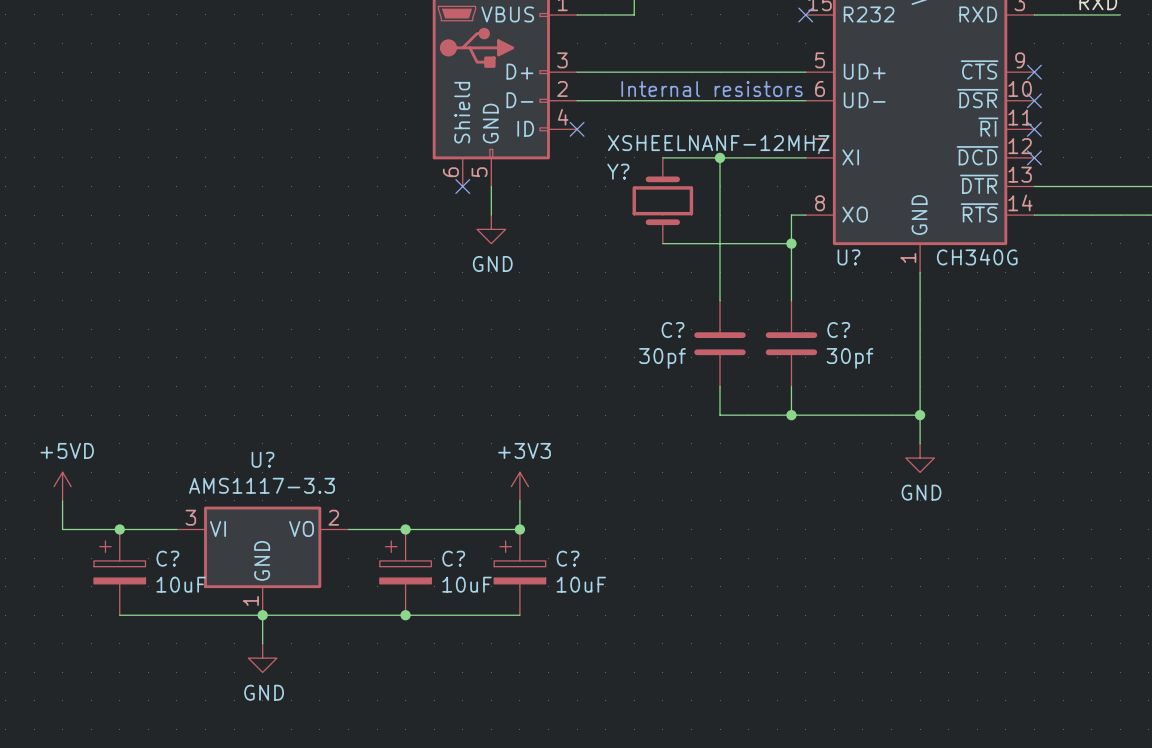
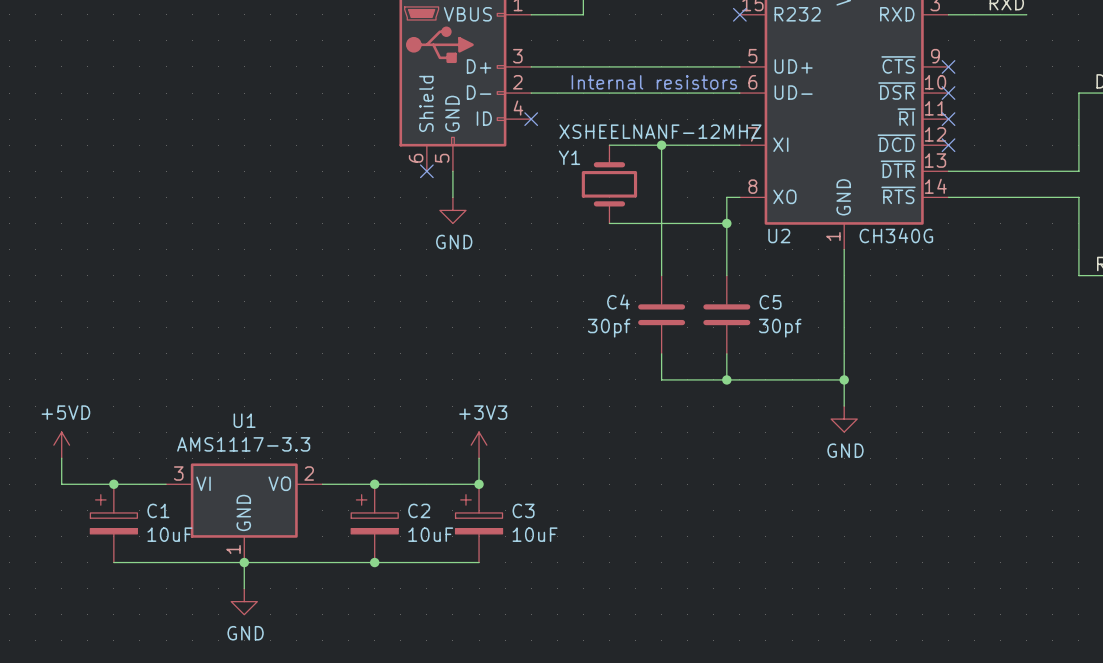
Y? name: Y? (618, 171) -> Y1 (569, 157)
U? name: U? (848, 257) -> U2 (779, 236)
C? name: C? (673, 330) -> C4 (618, 301)
C? name: C? (838, 330) -> C5 (770, 302)
U? name: U? (263, 459) -> U1 (244, 420)
C? name: C? (167, 558) -> C1 (158, 510)
C? name: C? (453, 558) -> C2 (419, 510)
C? name: C? (568, 558) -> C3 (523, 510)

